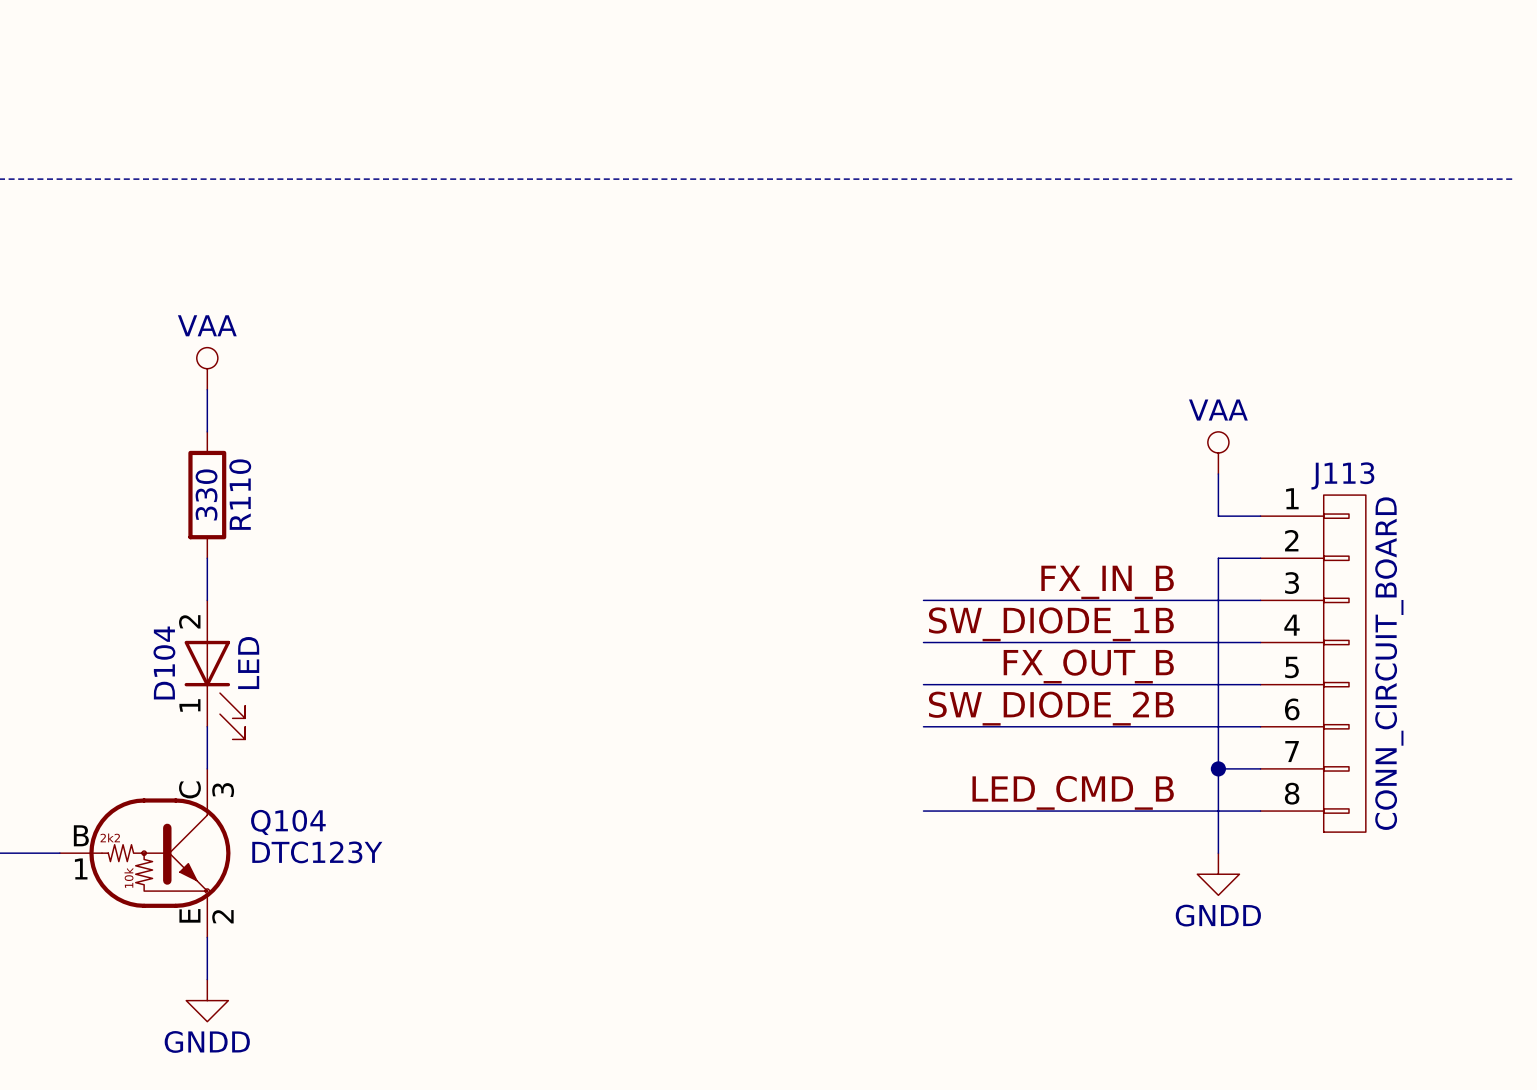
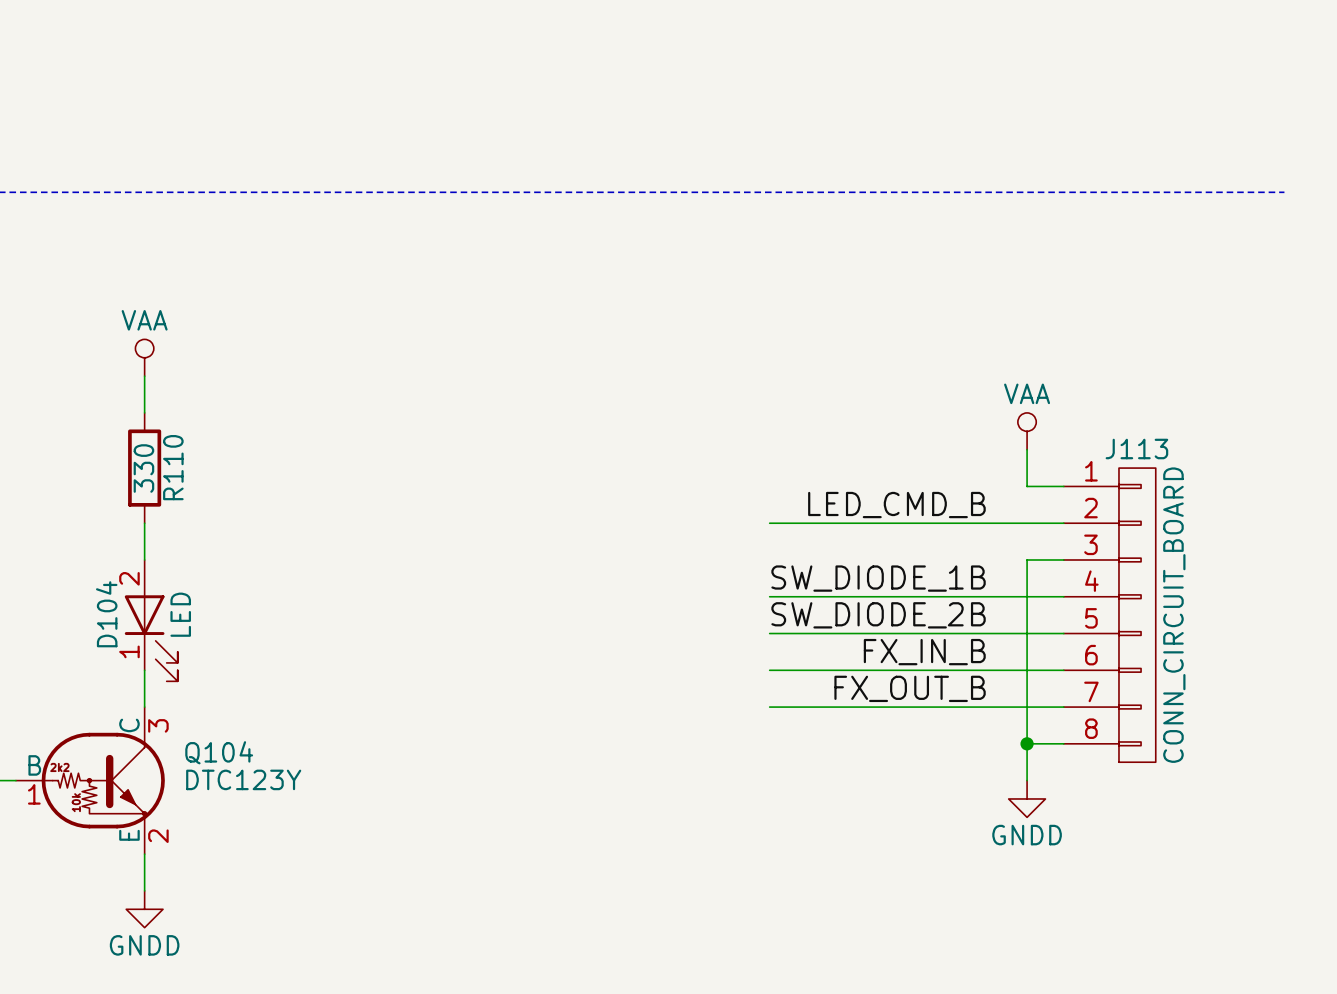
wire: (1218, 558) (1218, 600) (923, 600) -> (1027, 523) (769, 523)
label: FX_IN_B (1107, 582) -> none
label: FX_OUT_B (1088, 666) -> SW_DIODE_2B (878, 615)
label: SW_DIODE_2B (1051, 708) -> FX_IN_B (924, 652)
label: none -> FX_OUT_B (910, 688)
junction position: (1218, 768) -> (1027, 743)
label position: LED_CMD_B (1073, 792) -> LED_CMD_B (896, 505)
wire: (923, 811) (1218, 811) -> (769, 707) (1027, 707)

